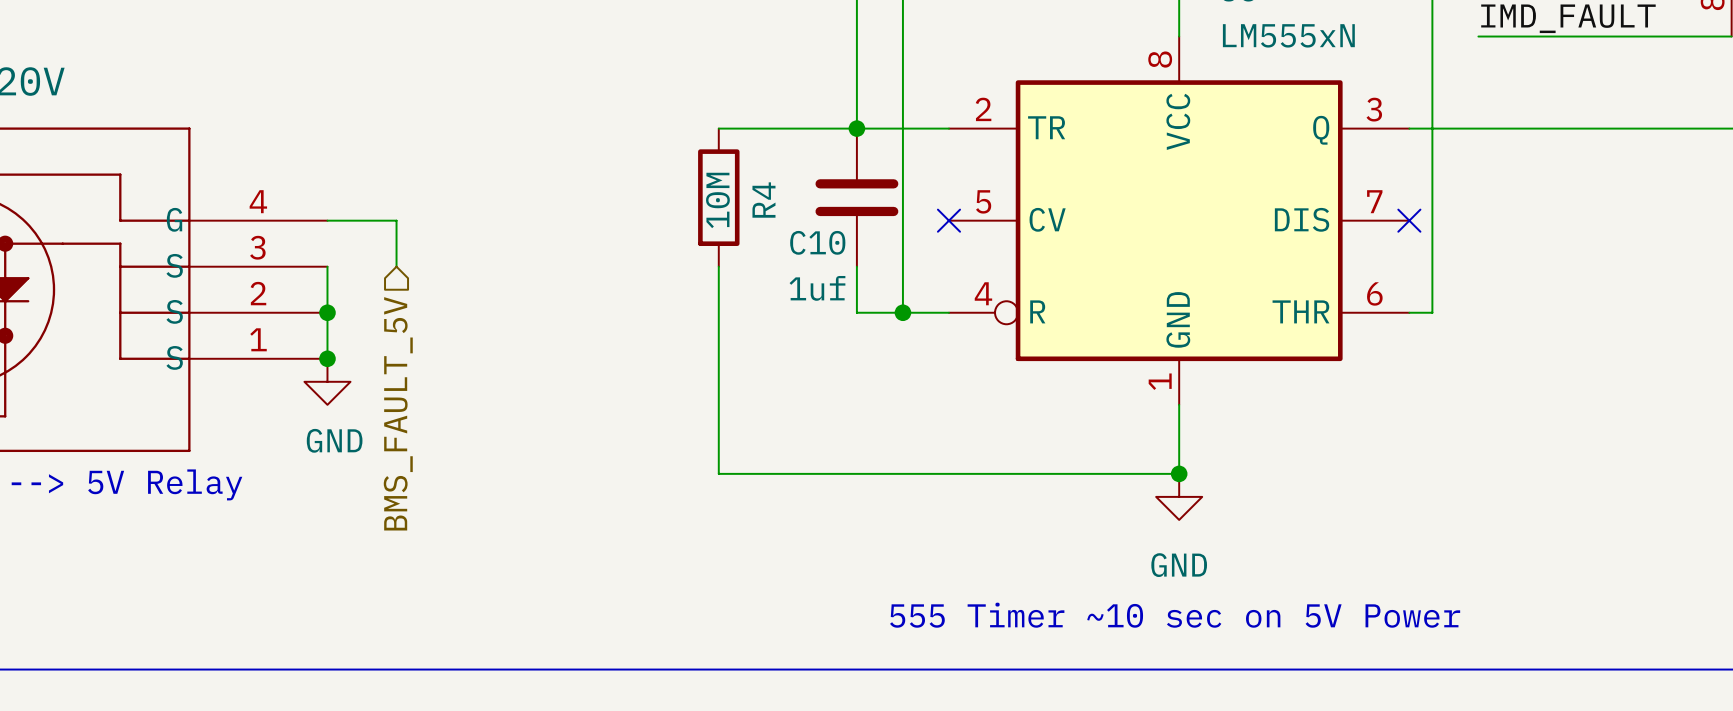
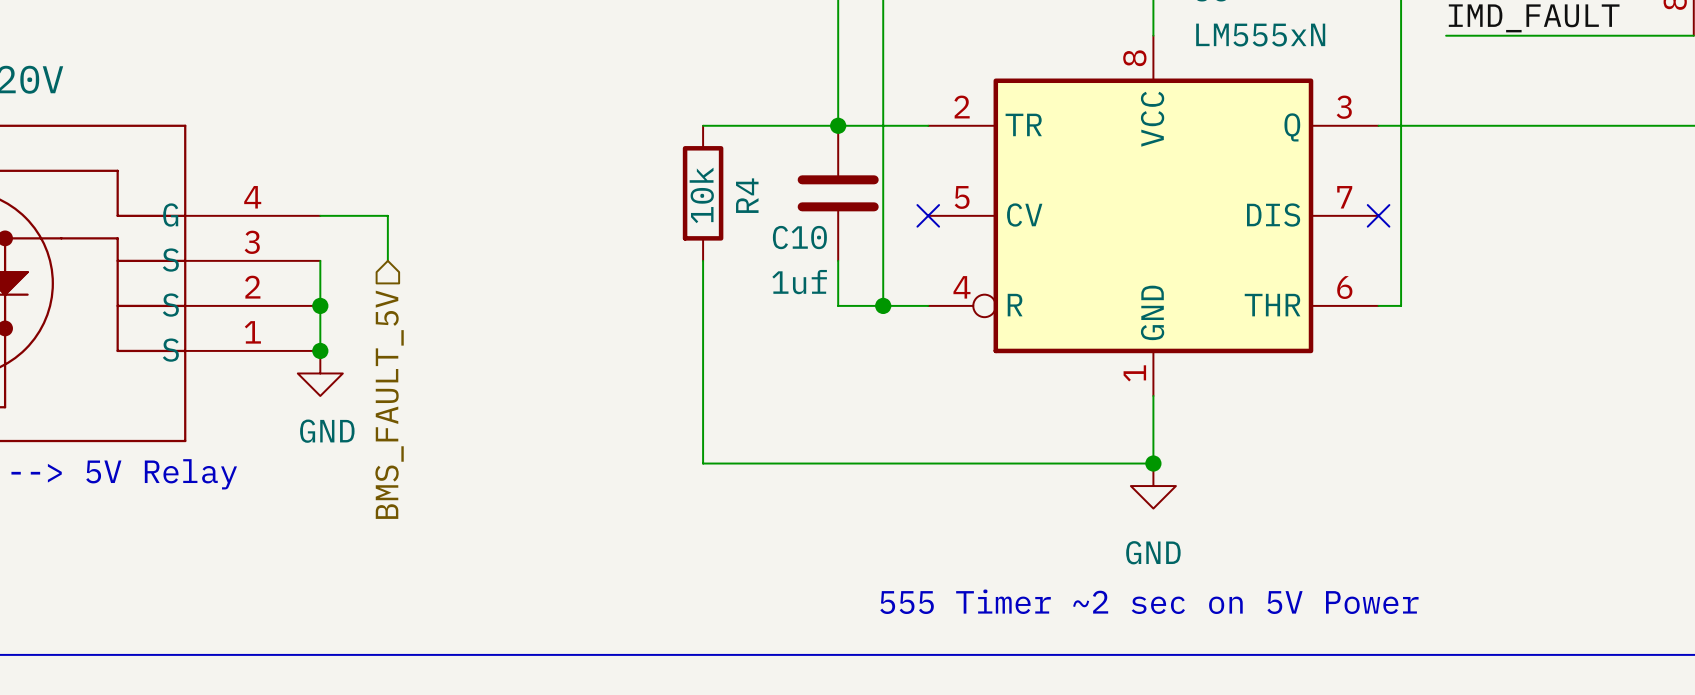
R4 value: 10M (717, 200) -> 10k (701, 195)
text: 555 Timer ~10 sec on 5V Power (1175, 615) -> 555 Timer ~2 sec on 5V Power (1149, 601)

